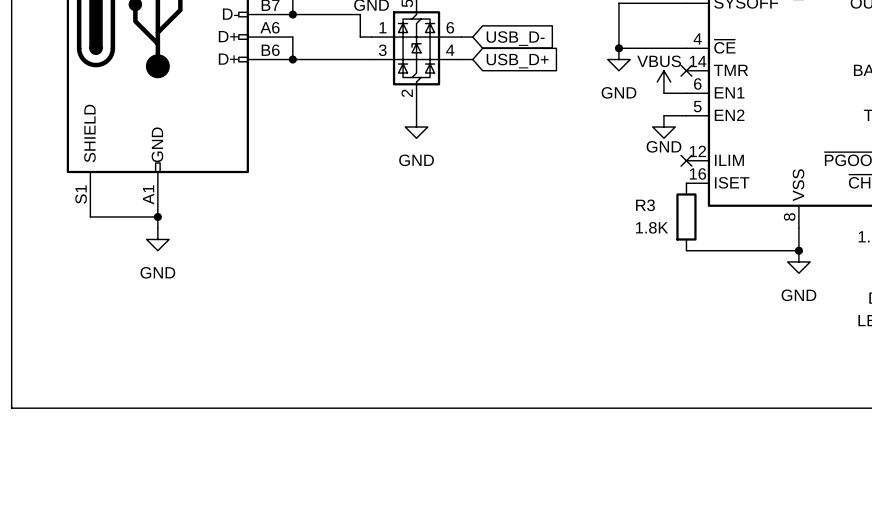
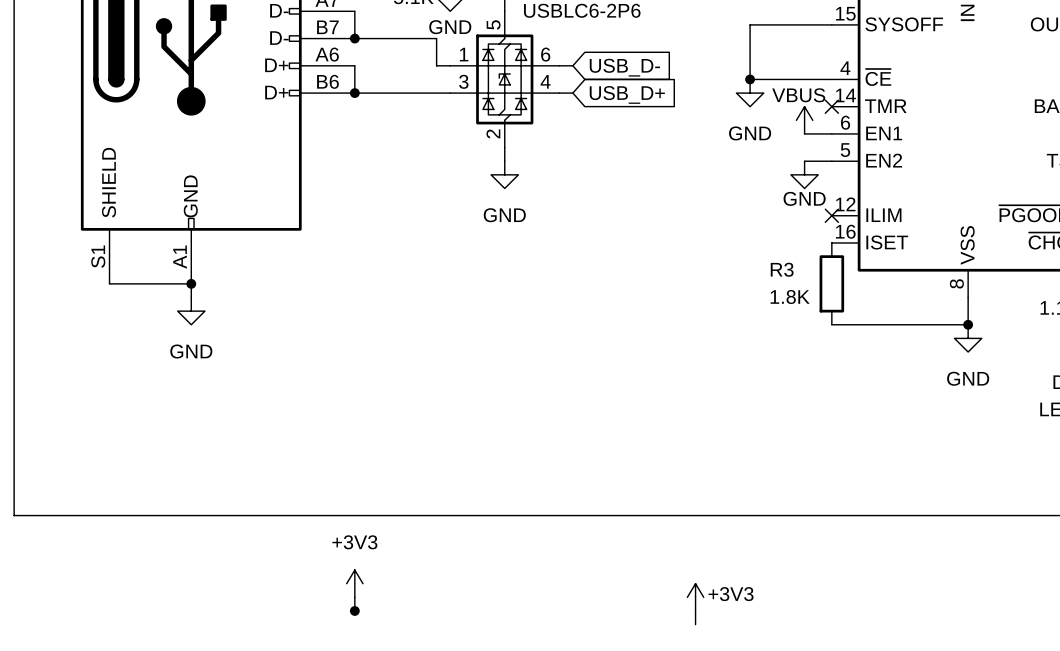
power symbol: none -> +3V3 (354, 583)
wire: none -> (354, 597) (354, 610)
power symbol: none -> +3V3 (695, 597)
junction: none -> (354, 610)
wire: none -> (695, 610) (695, 624)

